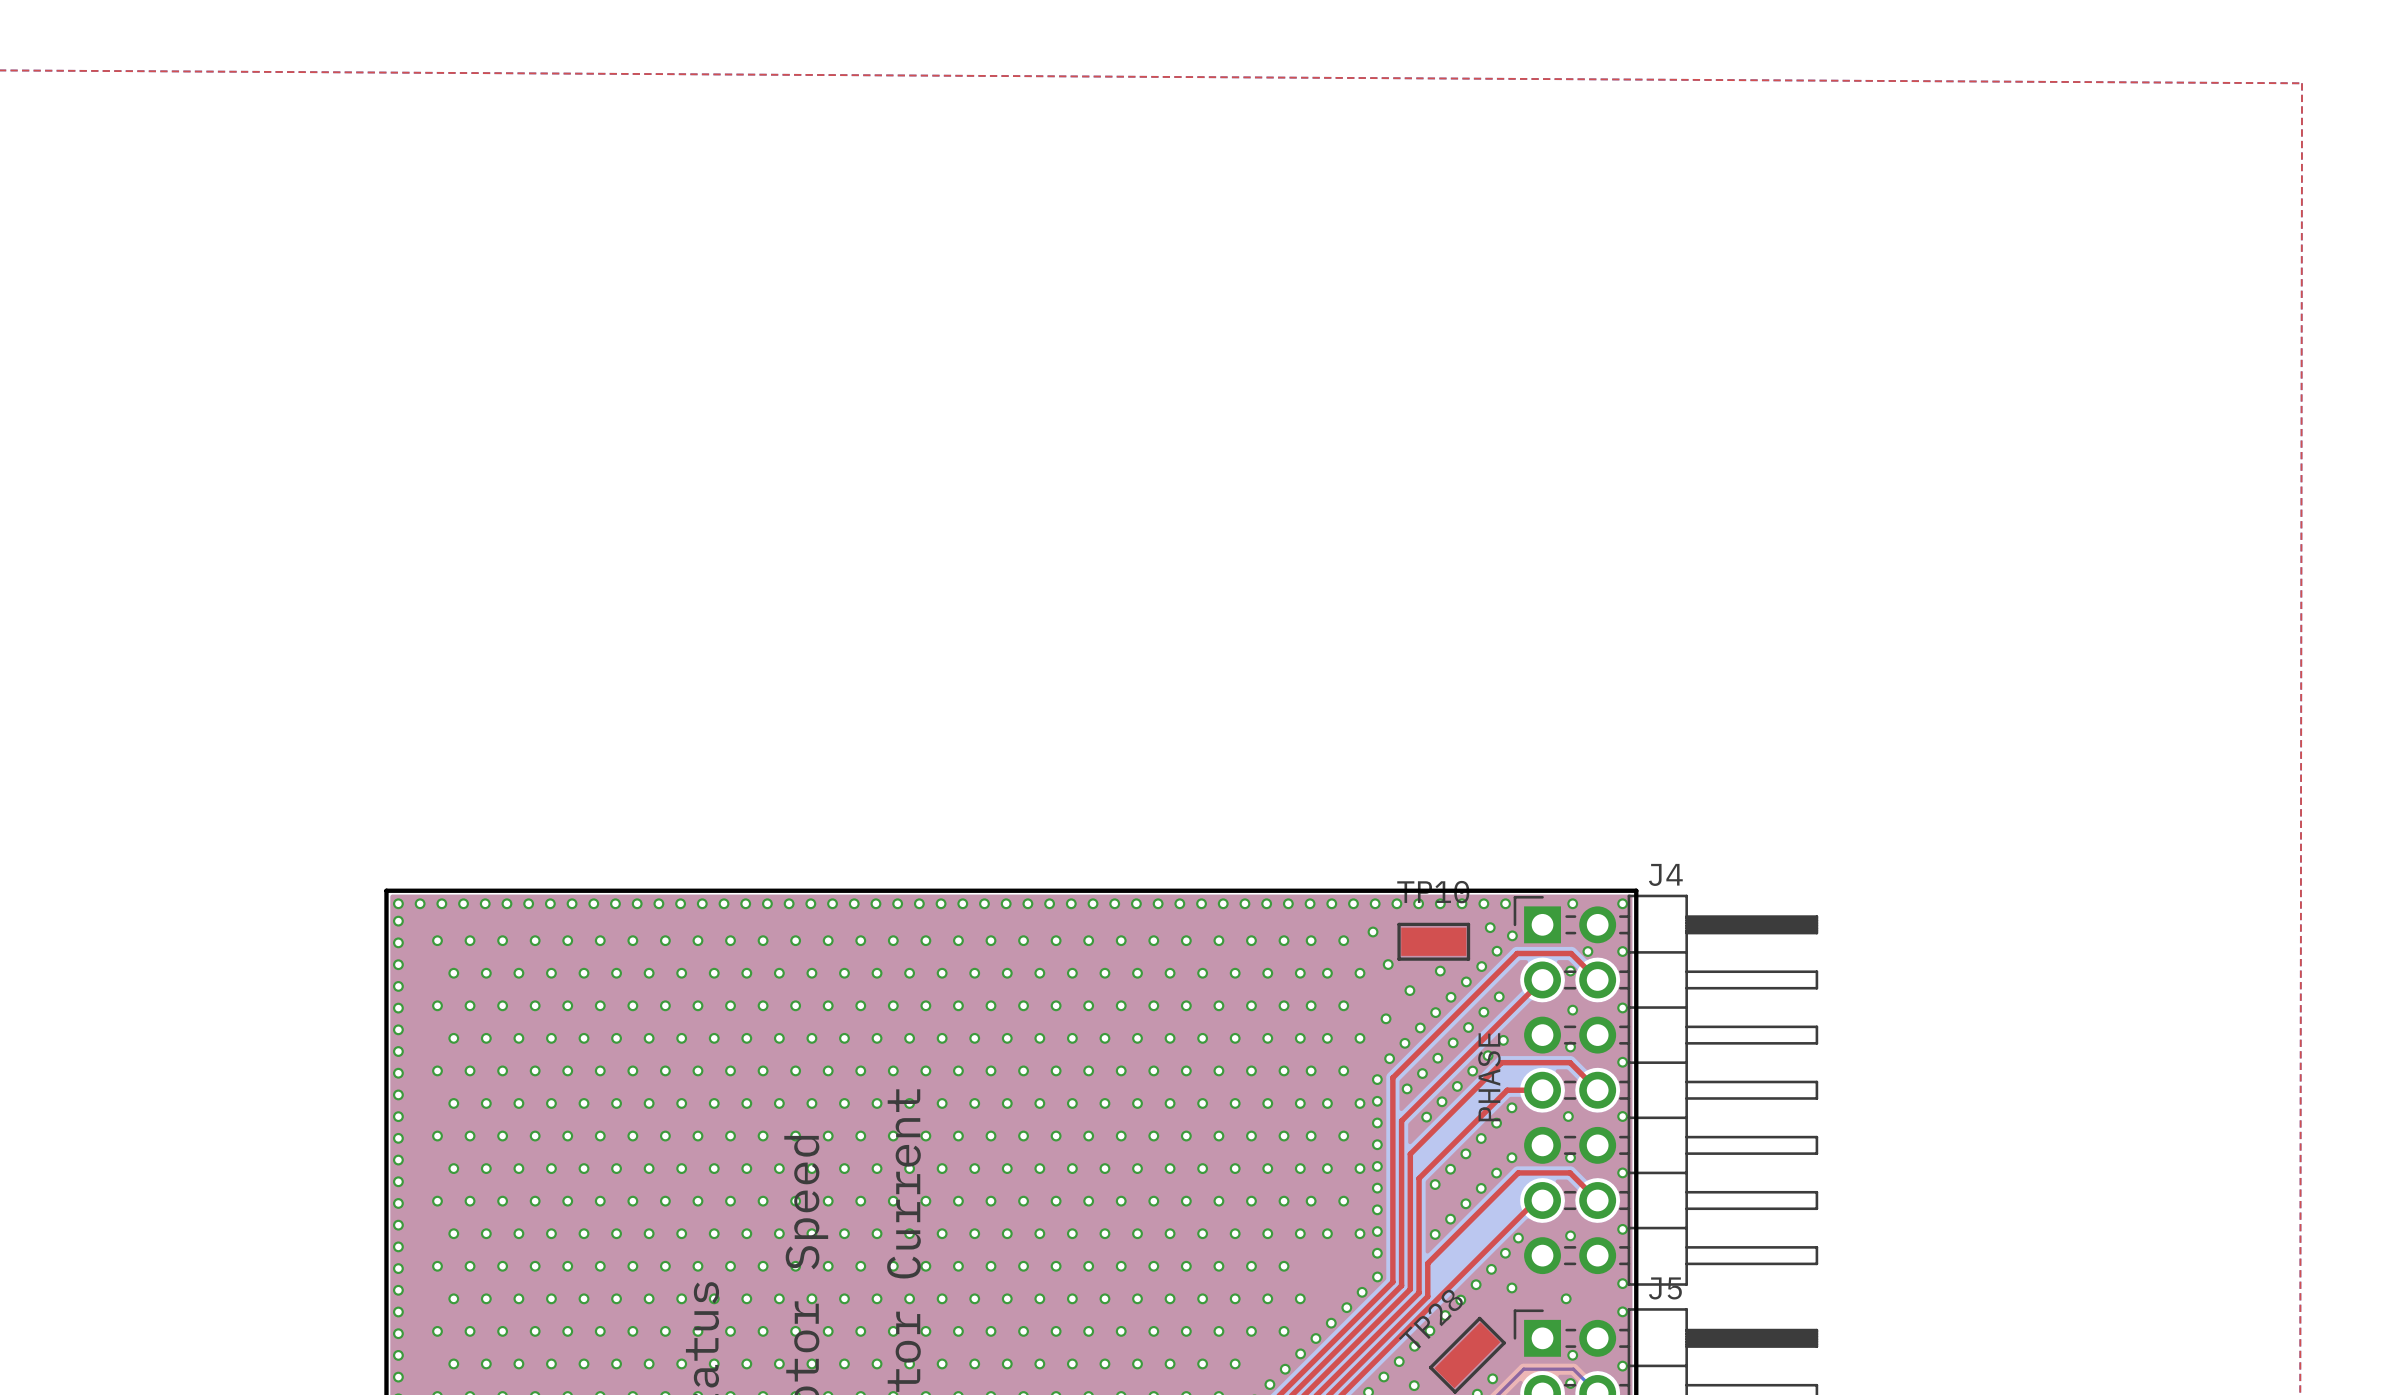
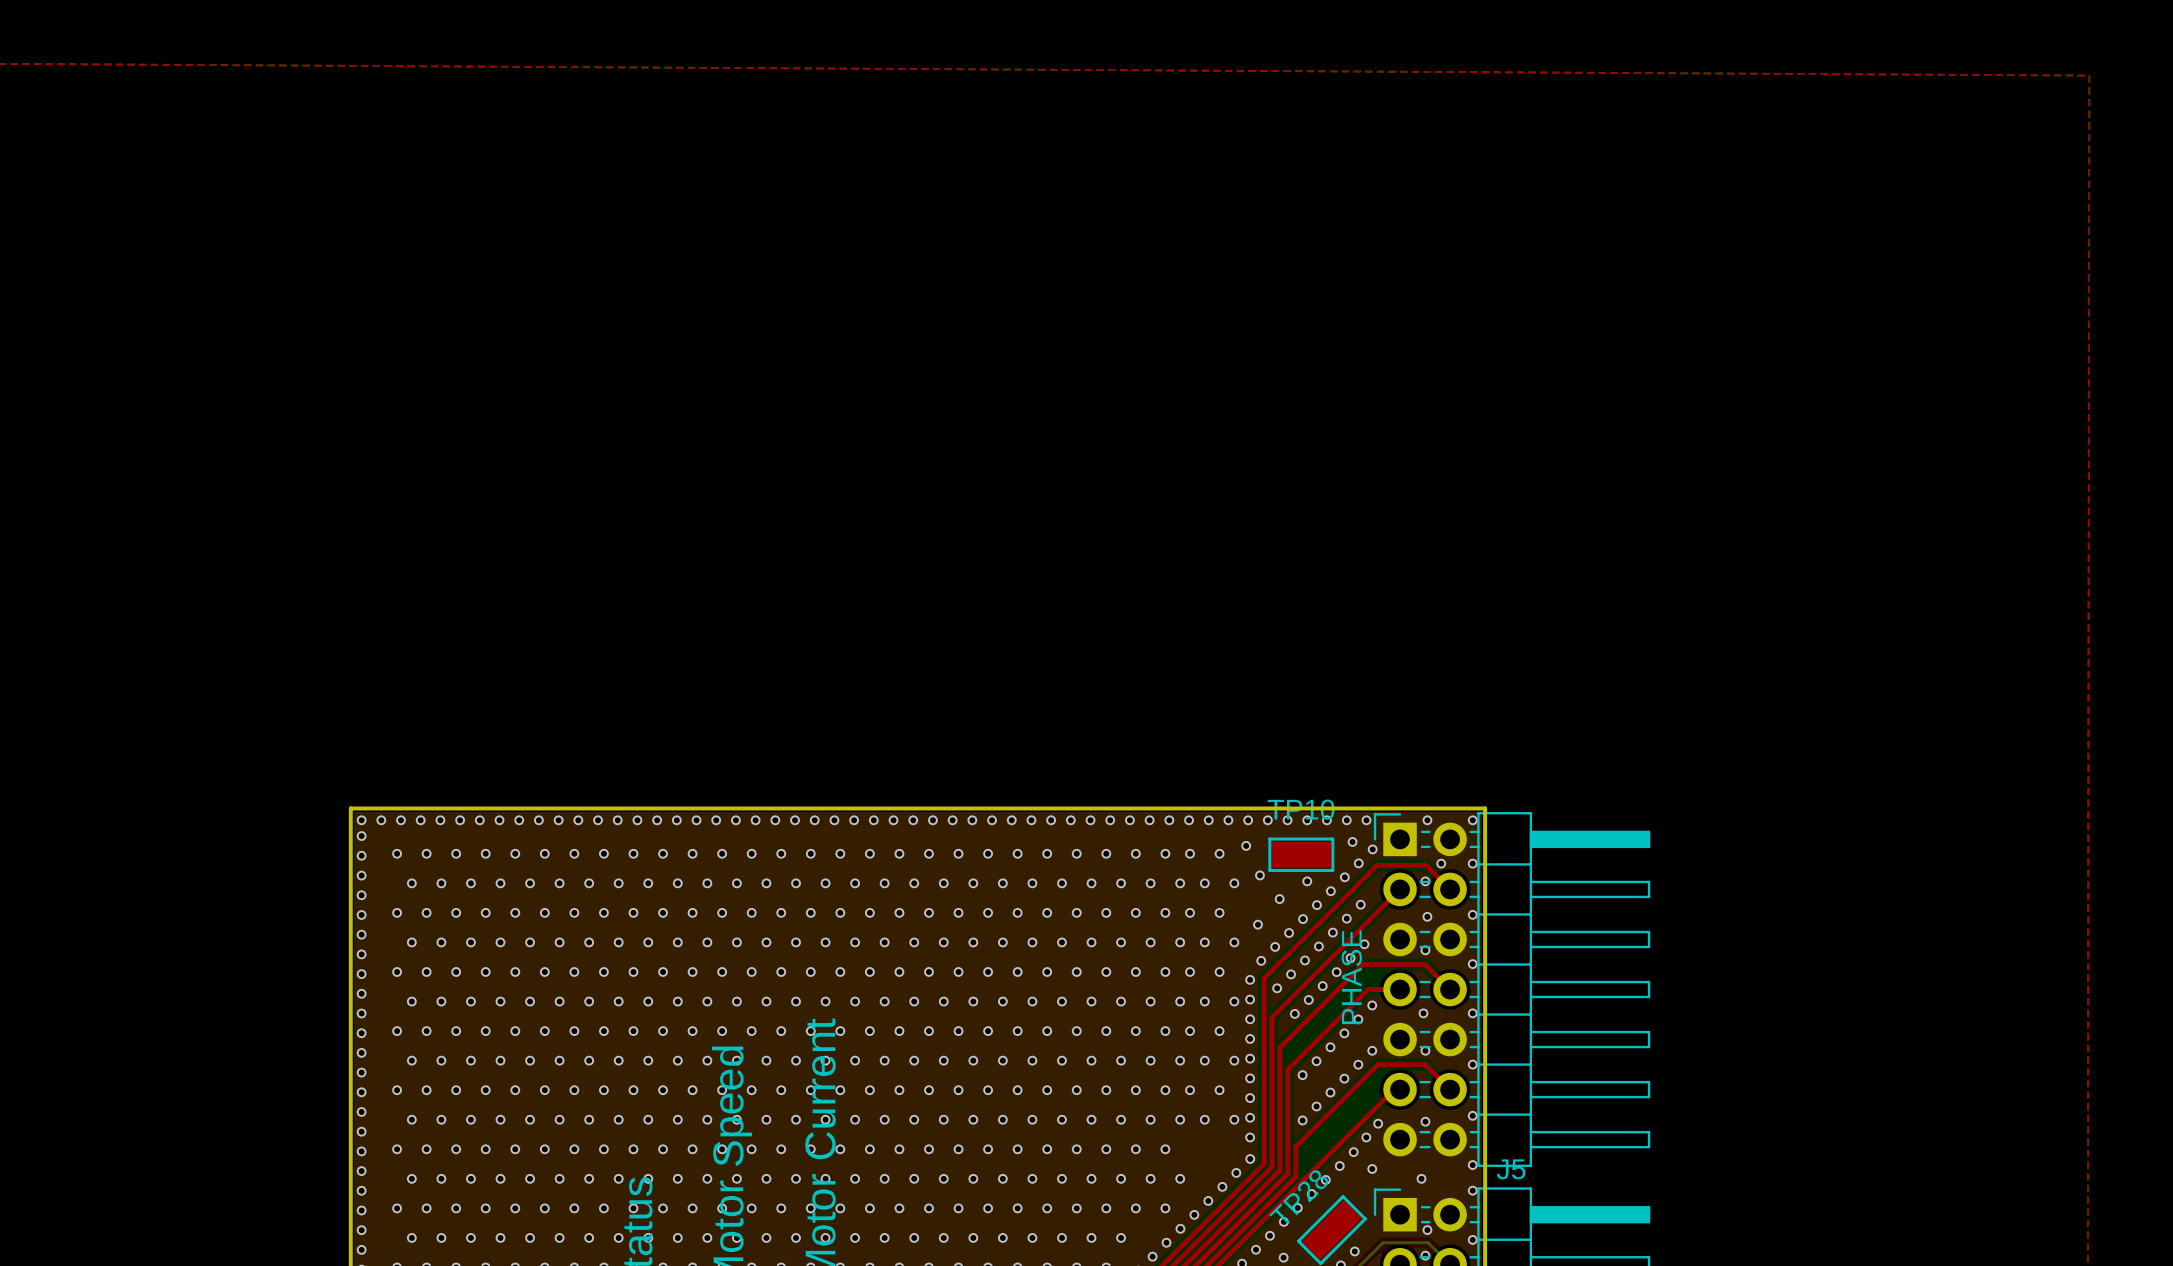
J4 name: J4 (1665, 874) -> none

